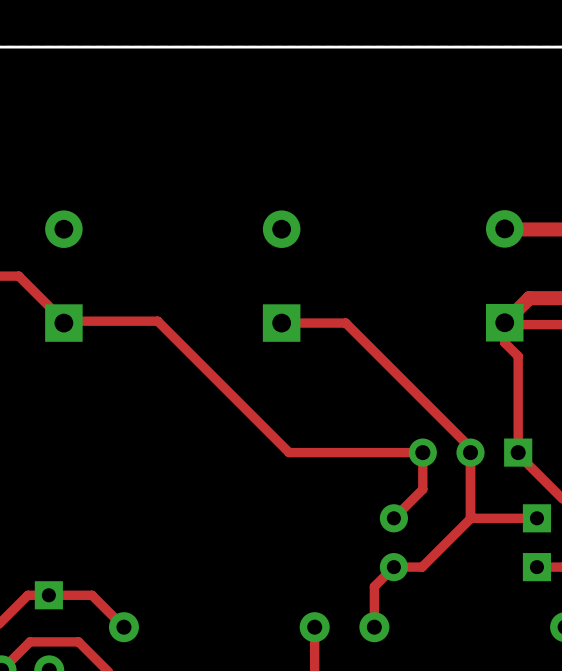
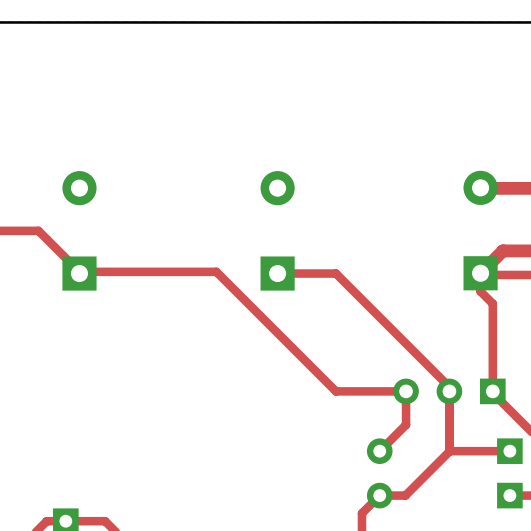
top track: (157, 321) (289, 452) (345, 452) -> (164, 271) (216, 271) (335, 391)

